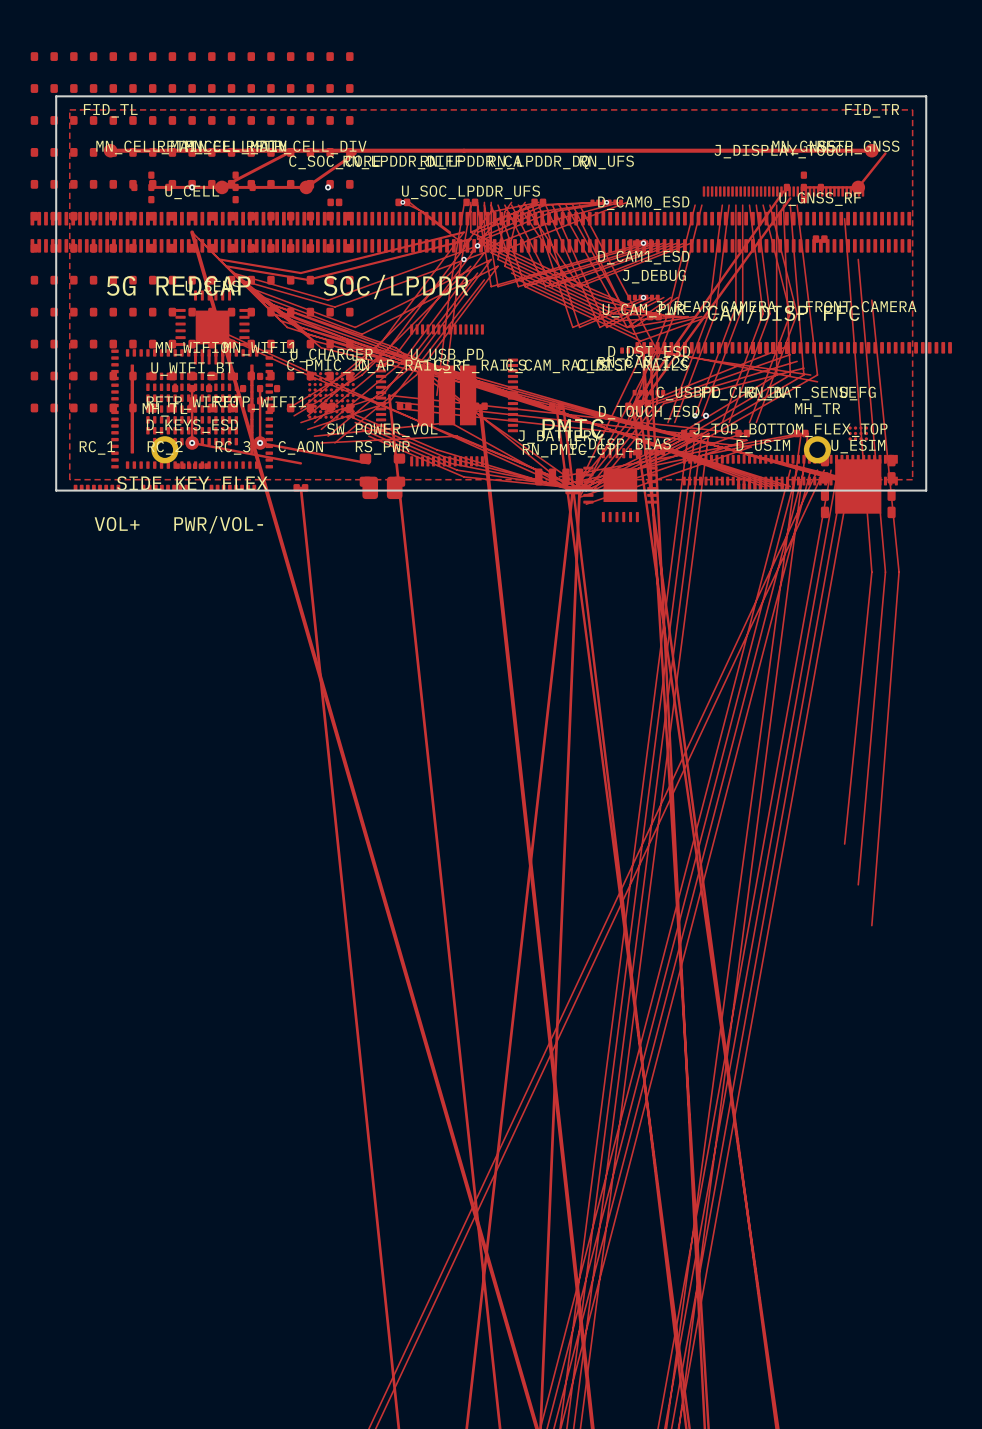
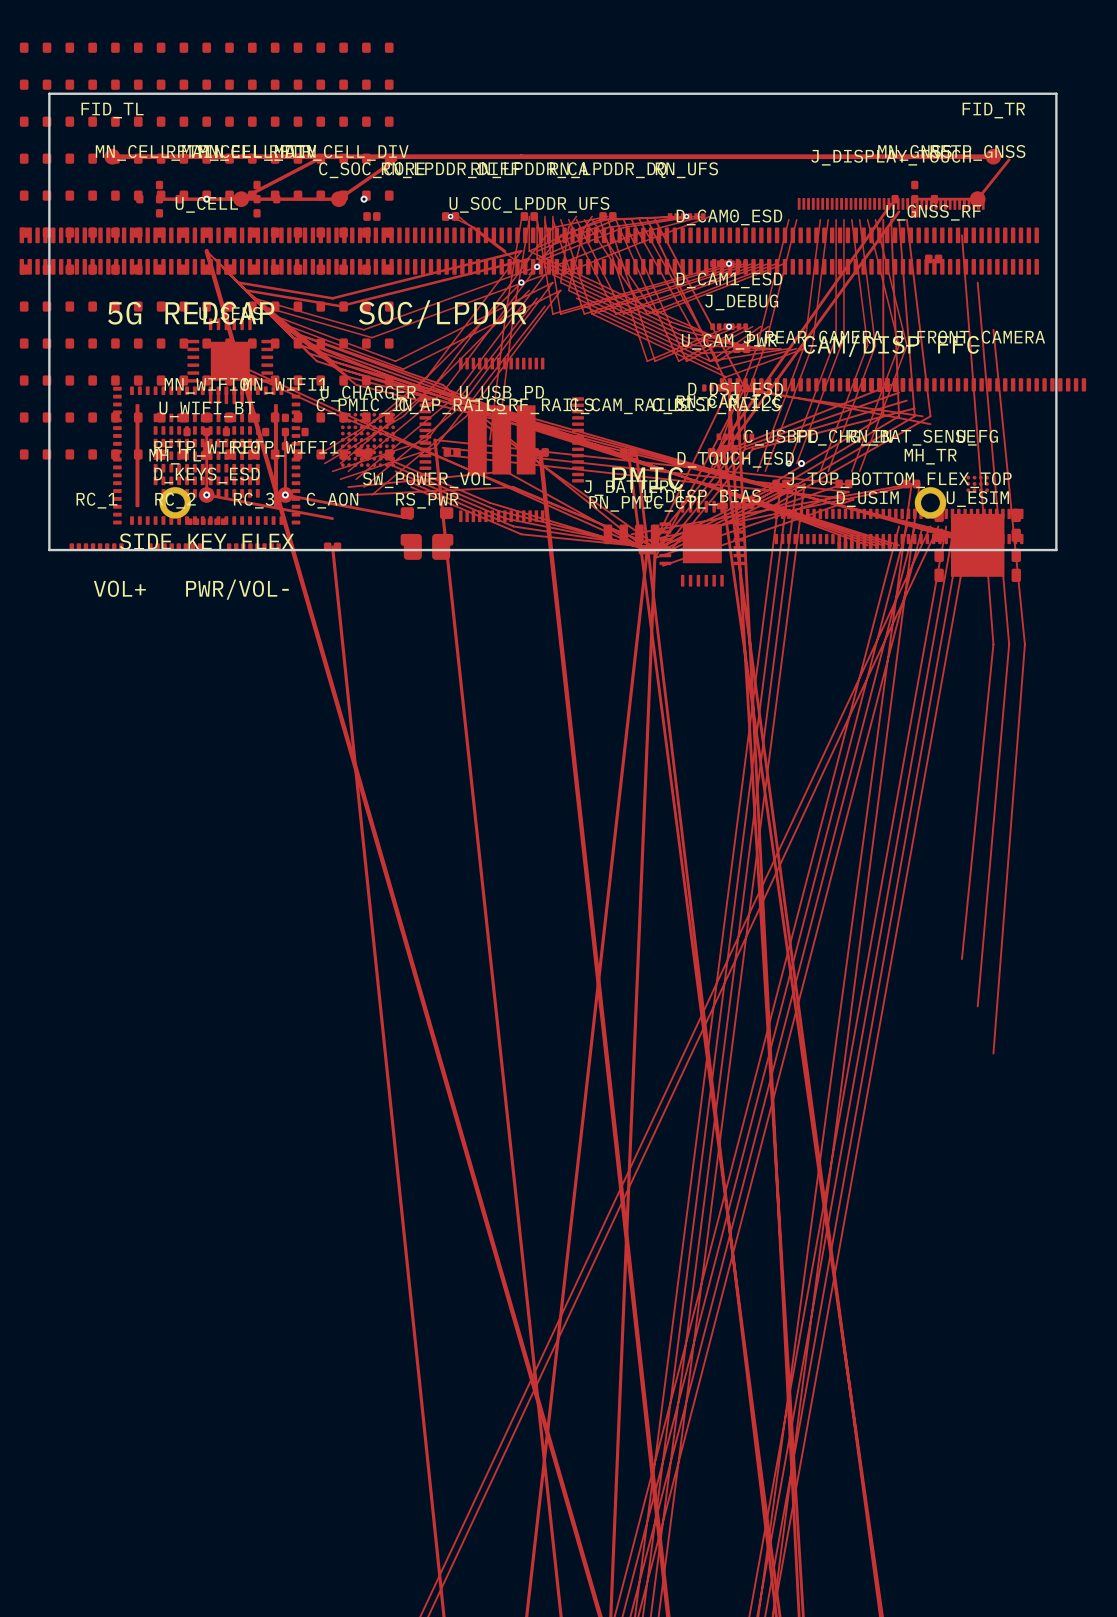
zone outline: (69, 109) (912, 109) (912, 479) (69, 479) (69, 109) -> none

